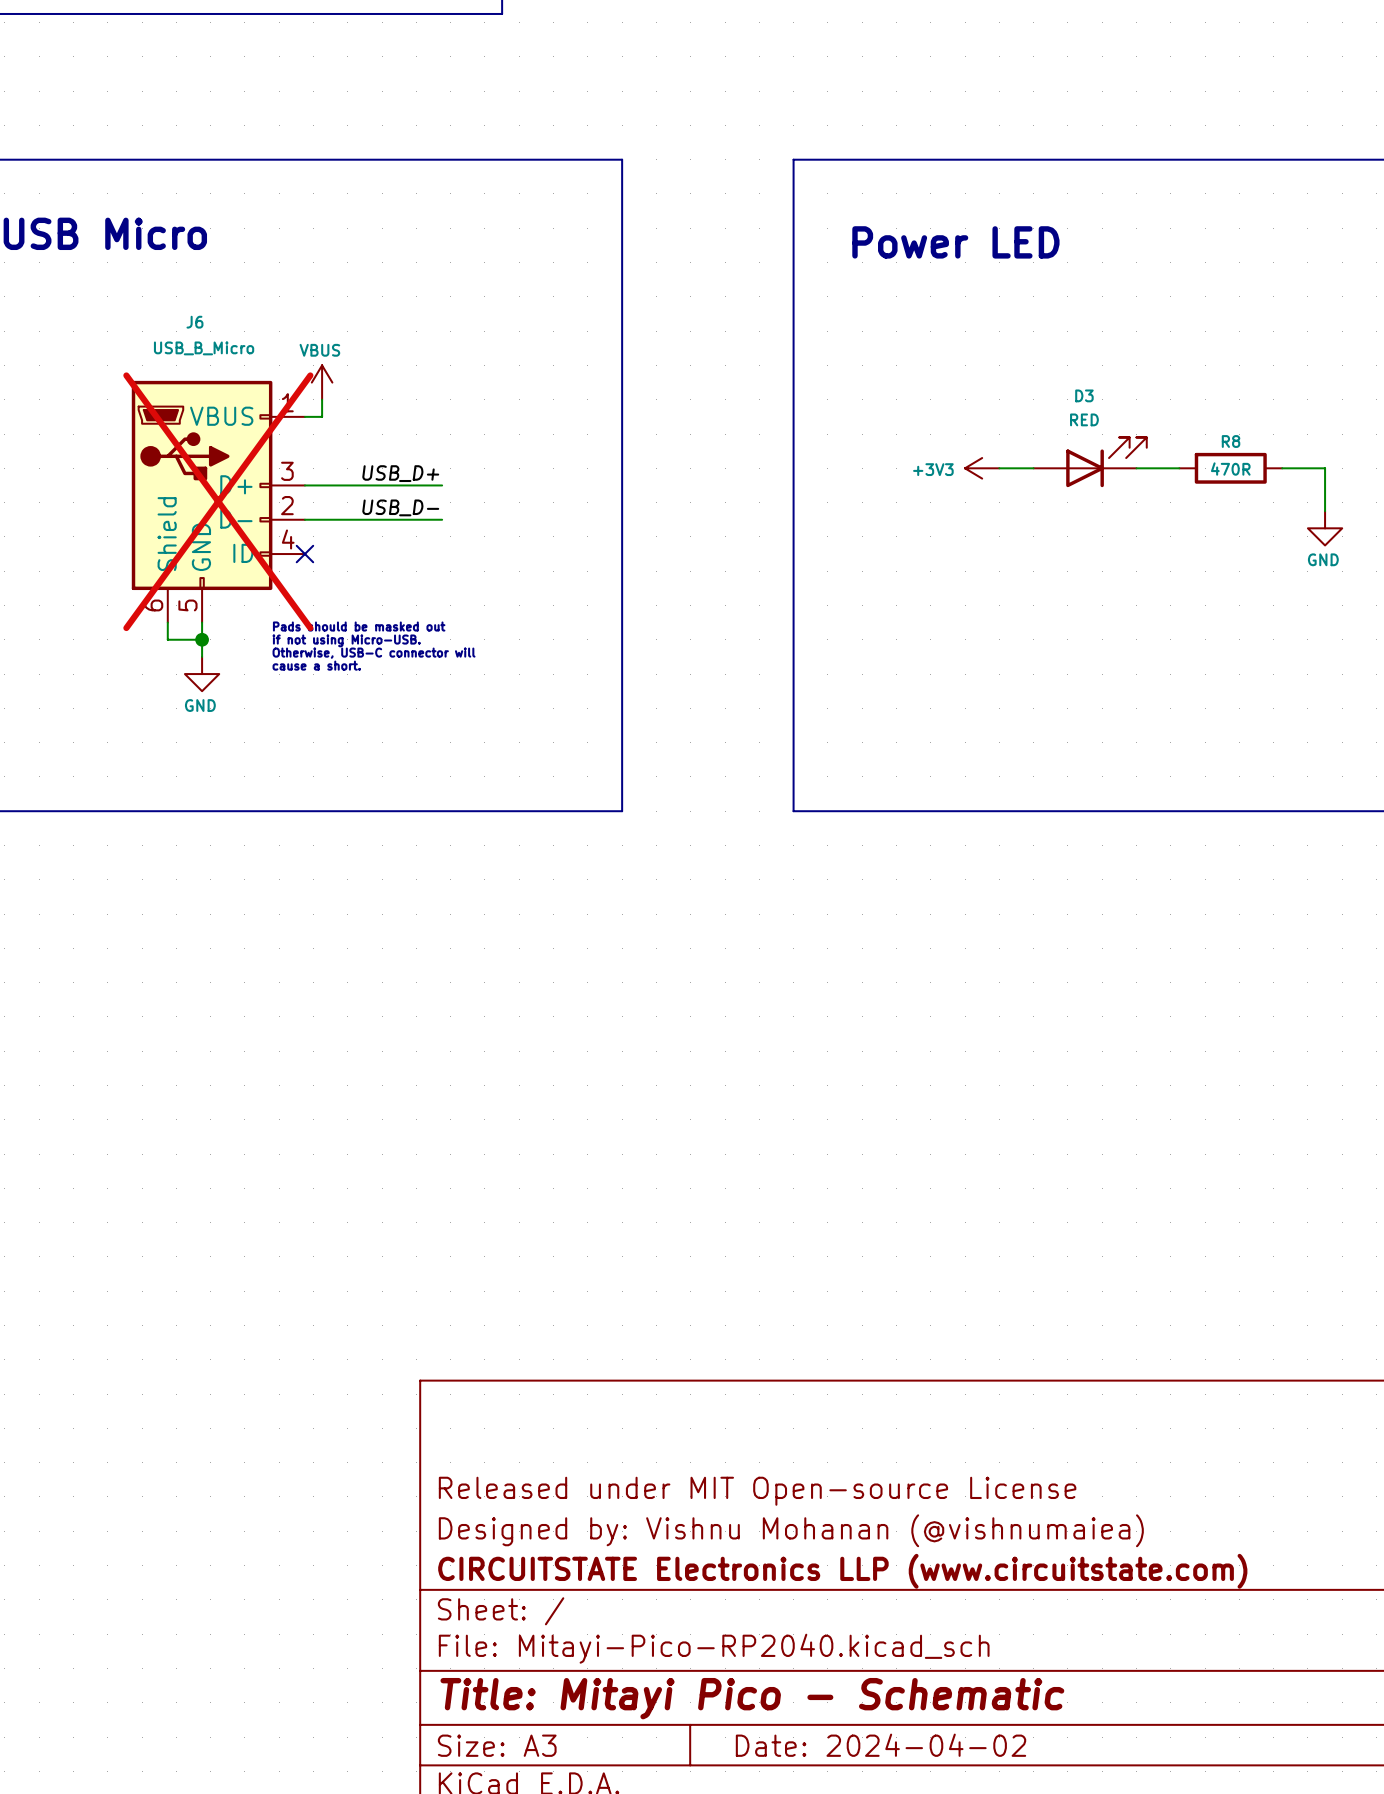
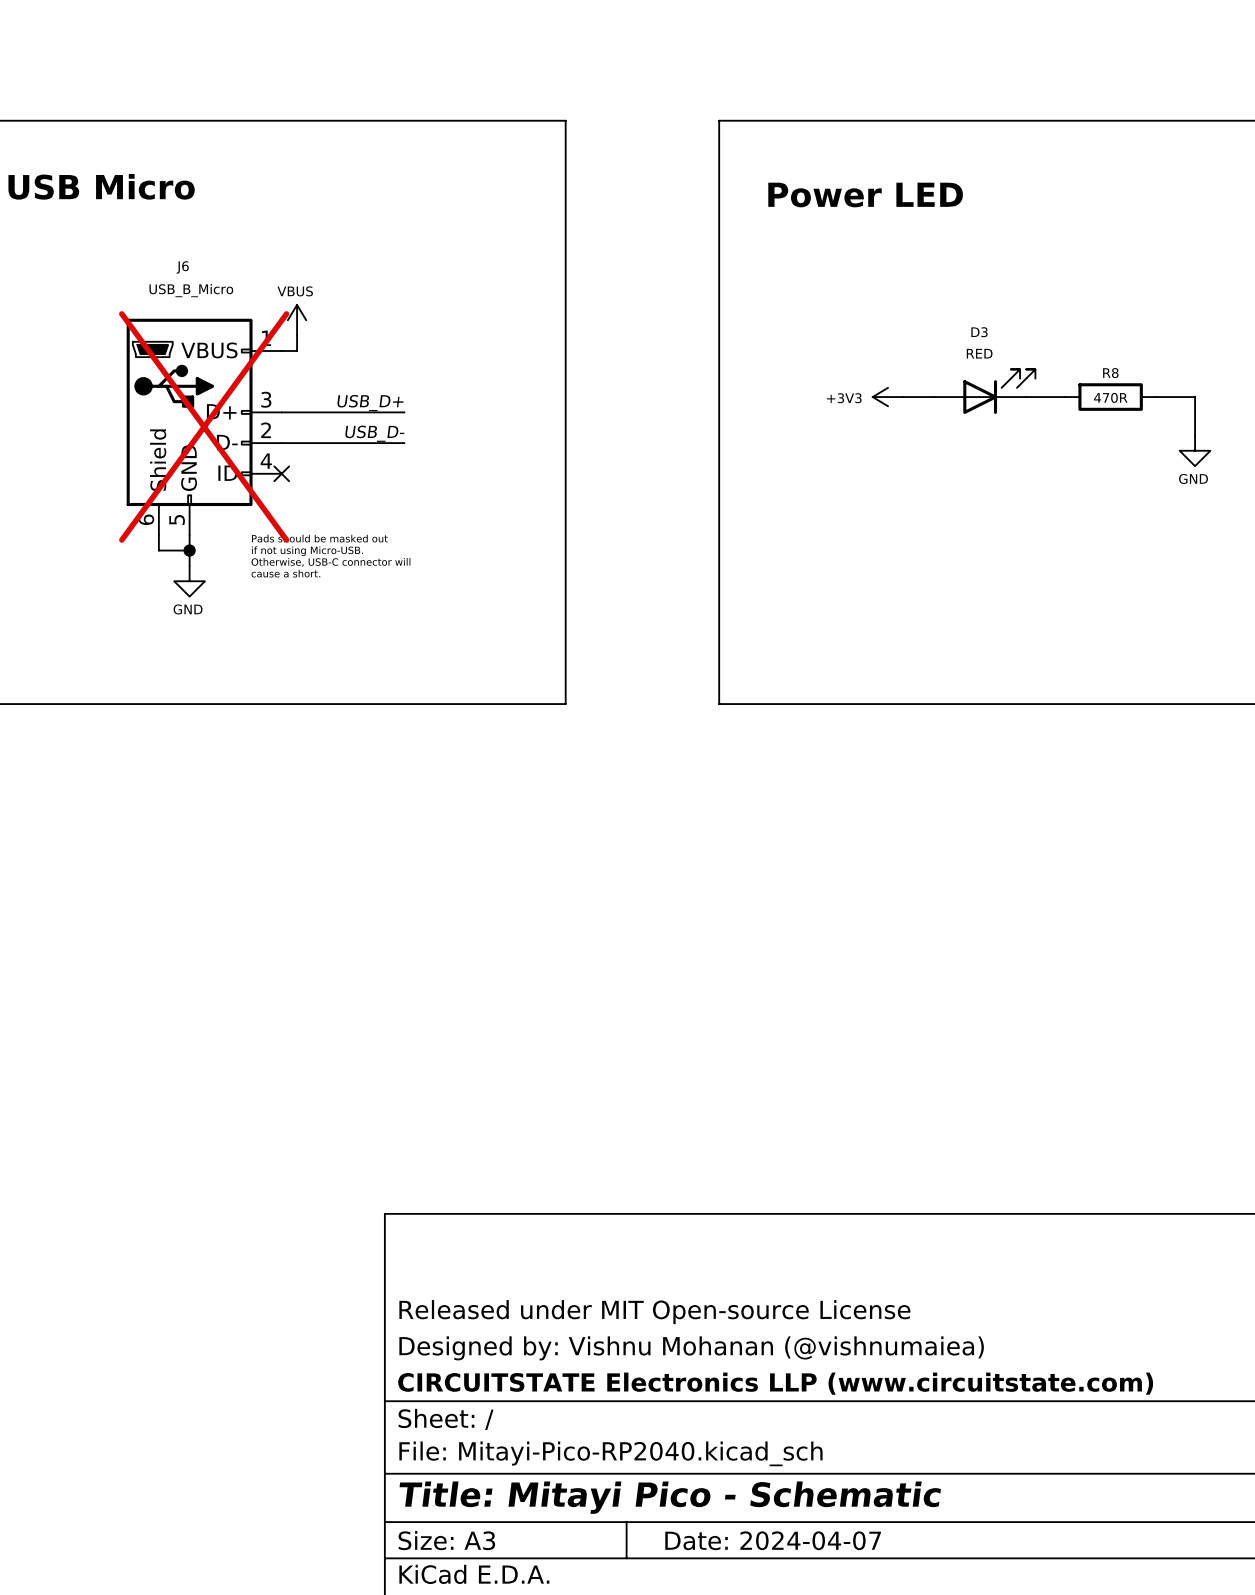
title block: Date: 2024-04-02 (881, 1745) -> Date: 2024-04-07 (773, 1540)

